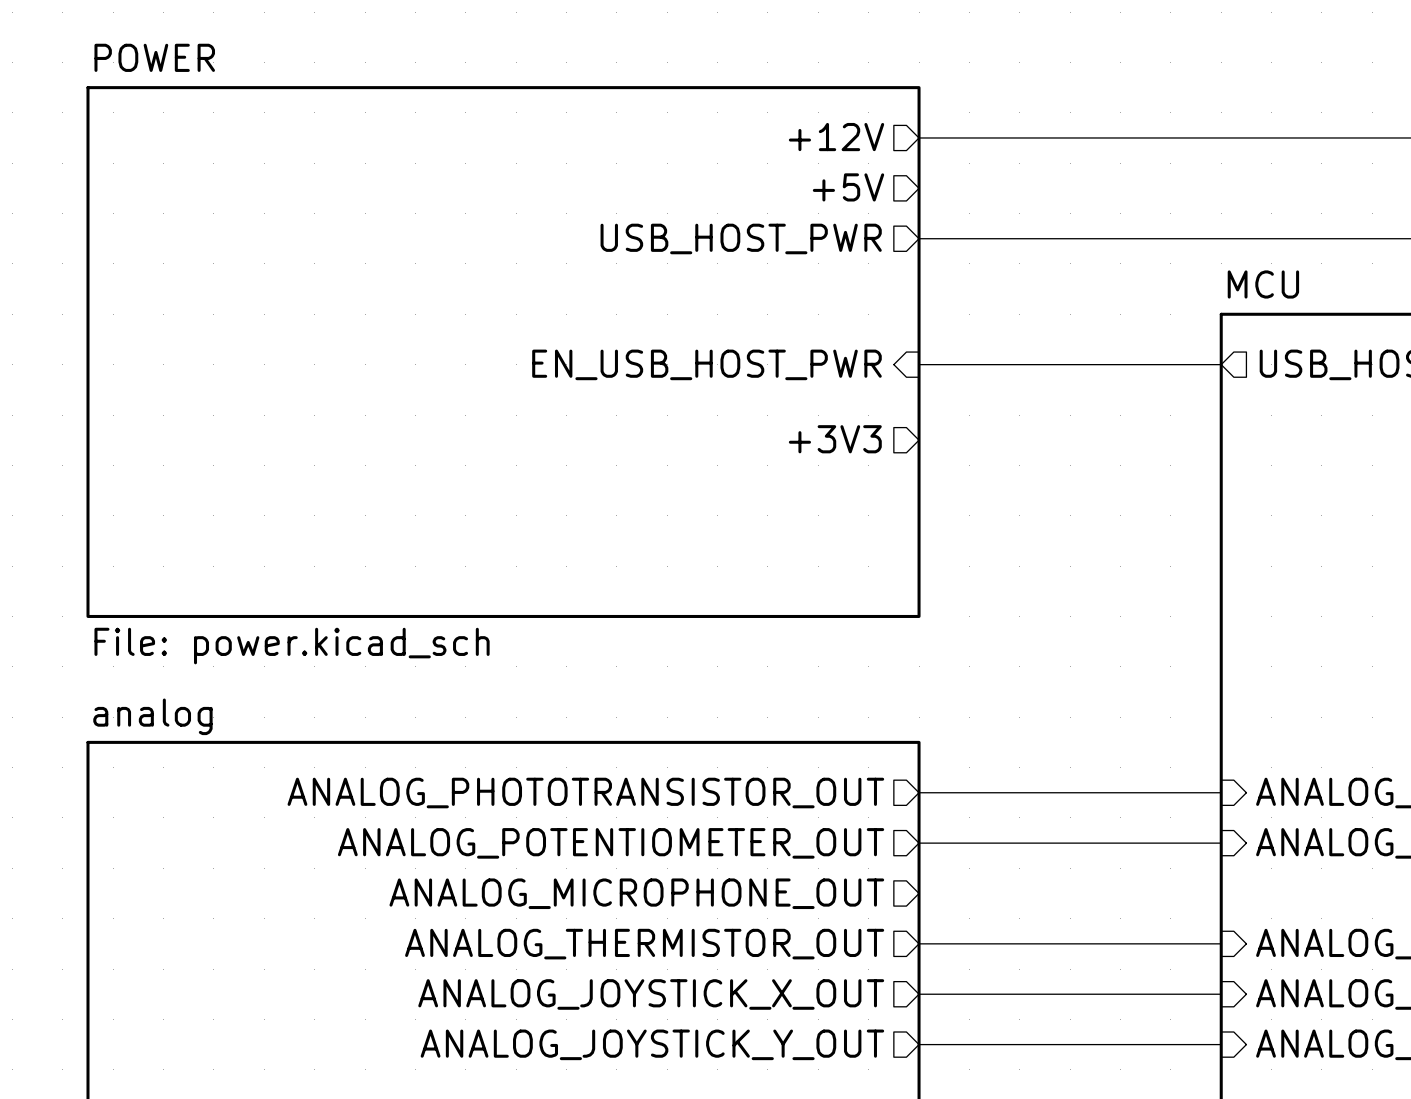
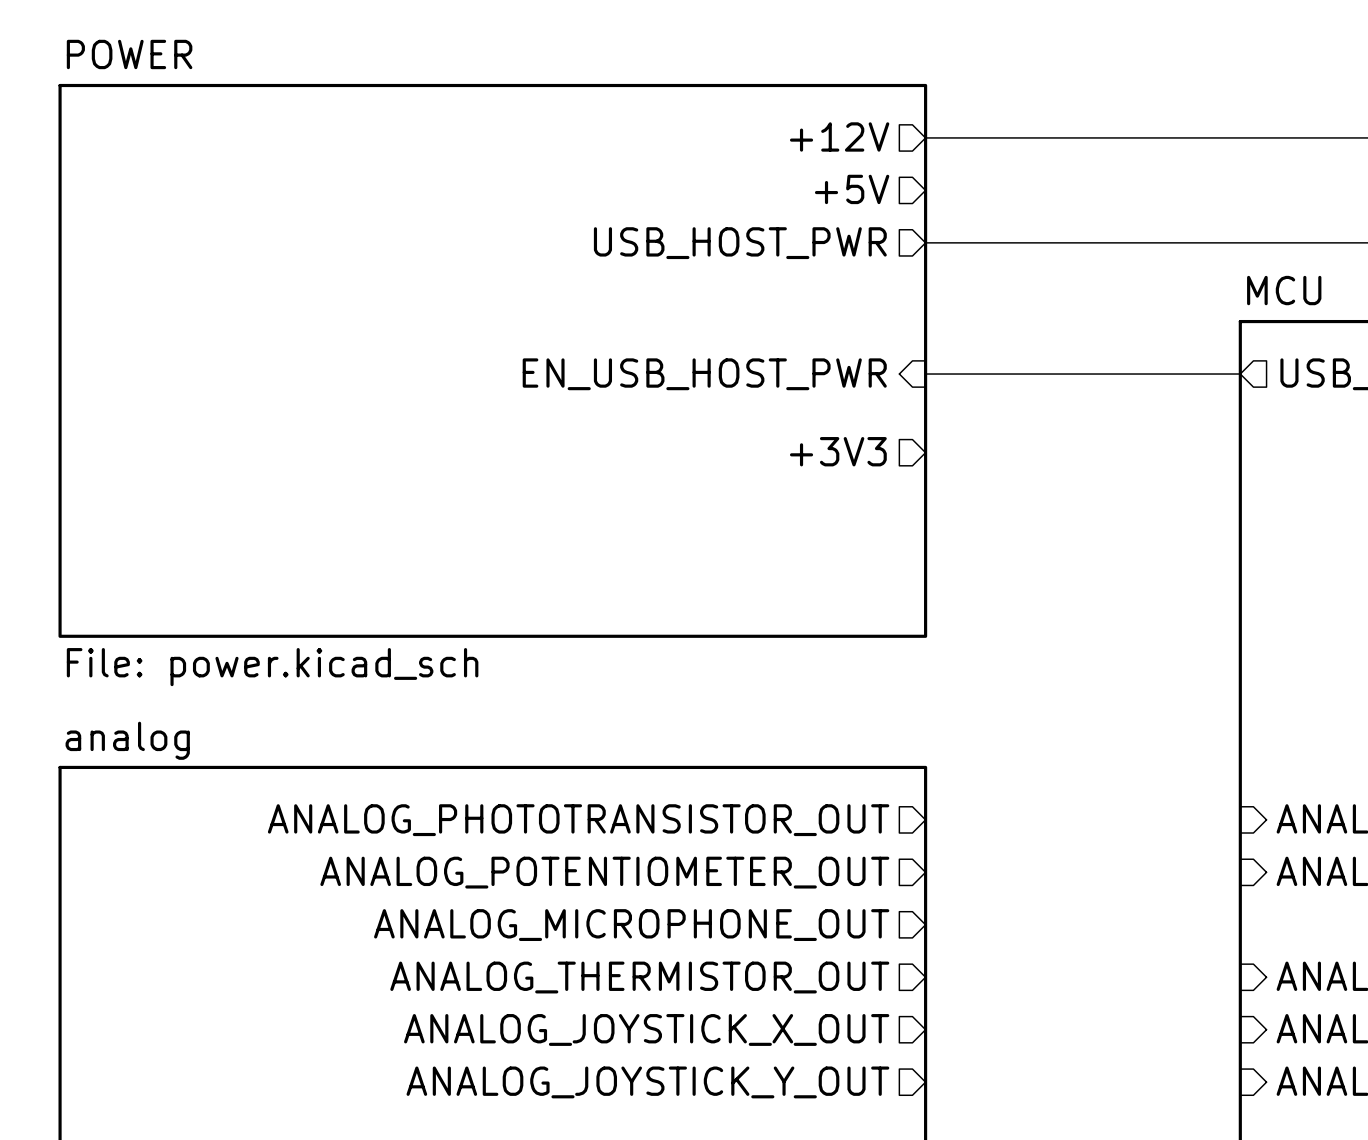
wire: (919, 792) (1221, 792) -> none
wire: (919, 843) (1221, 843) -> none
wire: (919, 943) (1221, 943) -> none
wire: (919, 994) (1221, 994) -> none
wire: (919, 1044) (1221, 1044) -> none

